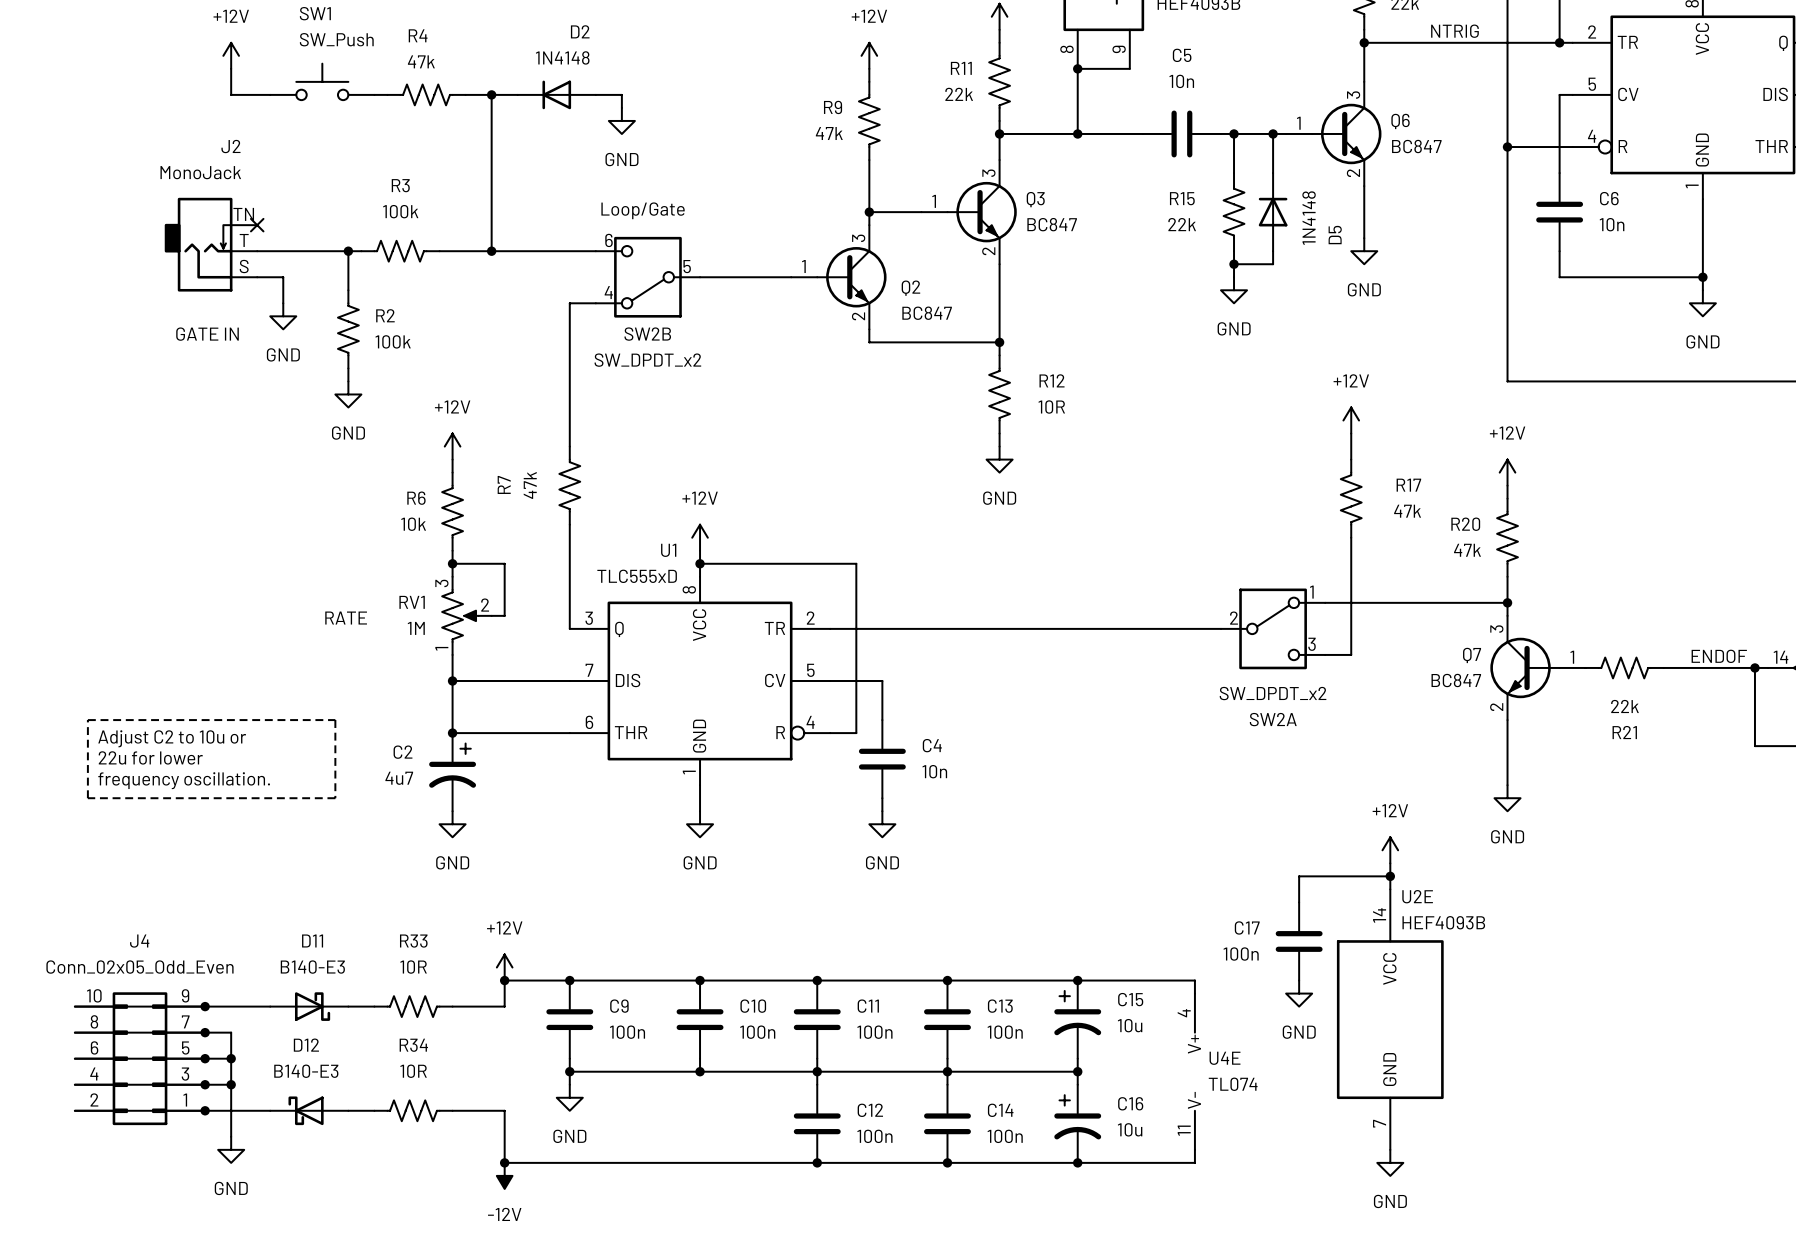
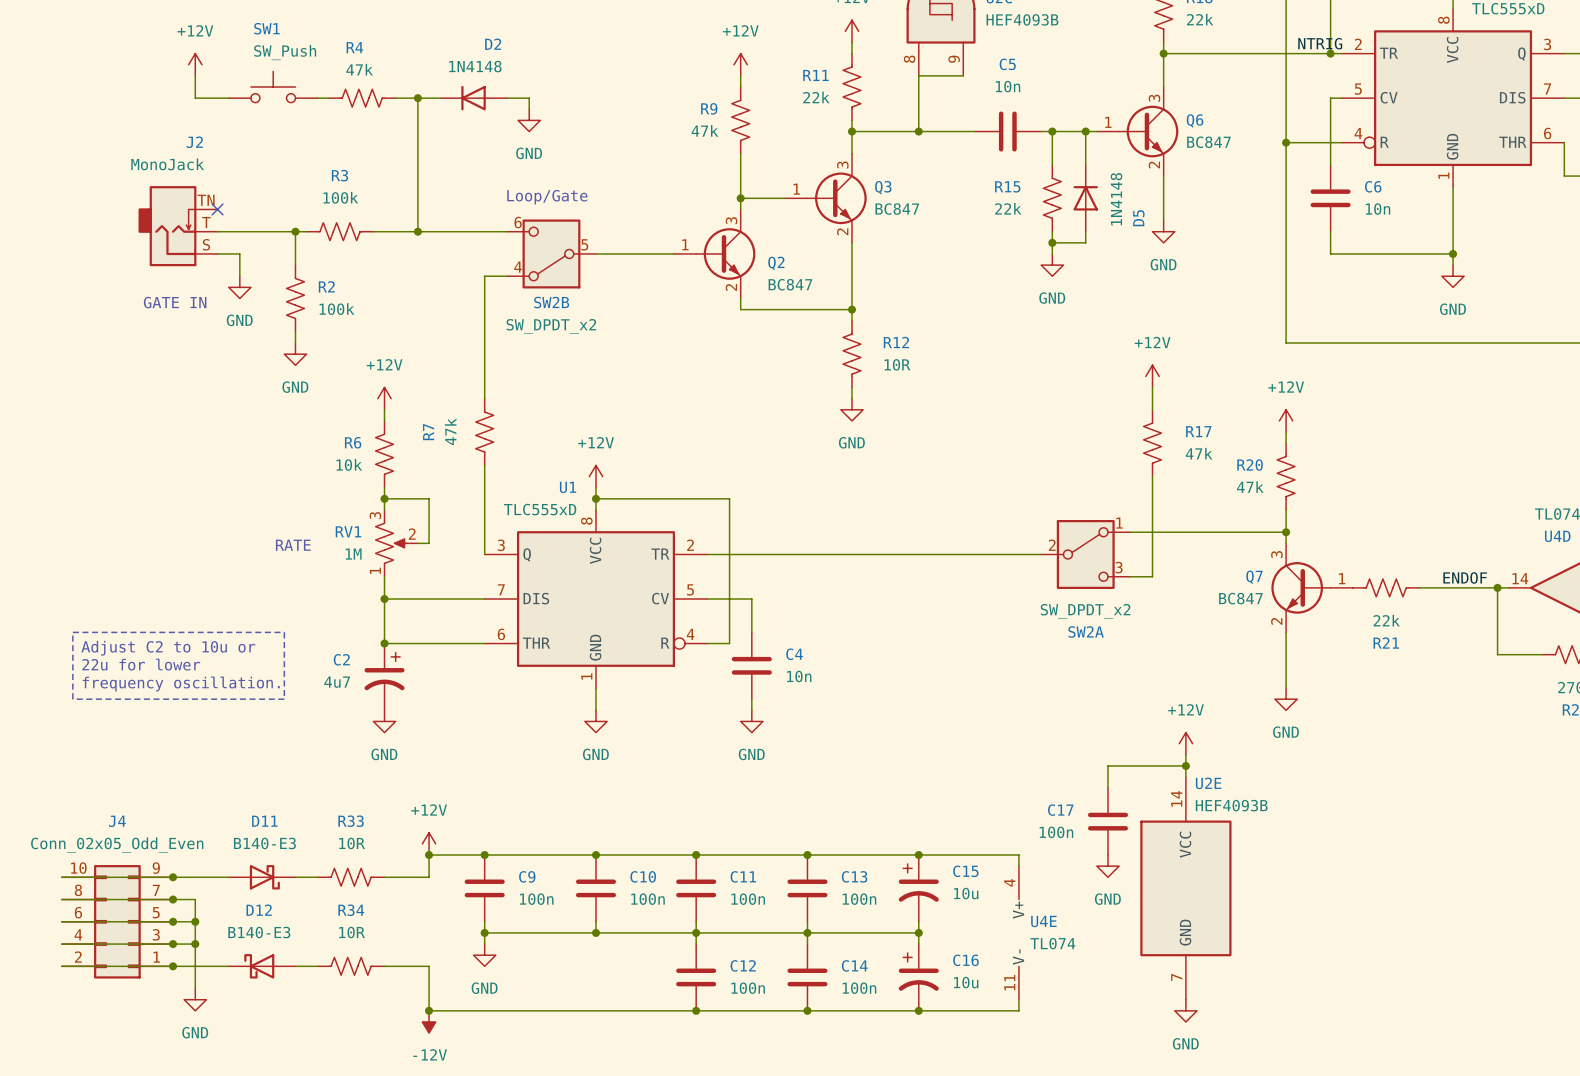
label position: NTRIG (1454, 31) -> NTRIG (1320, 43)
junction: (1077, 68) -> none

